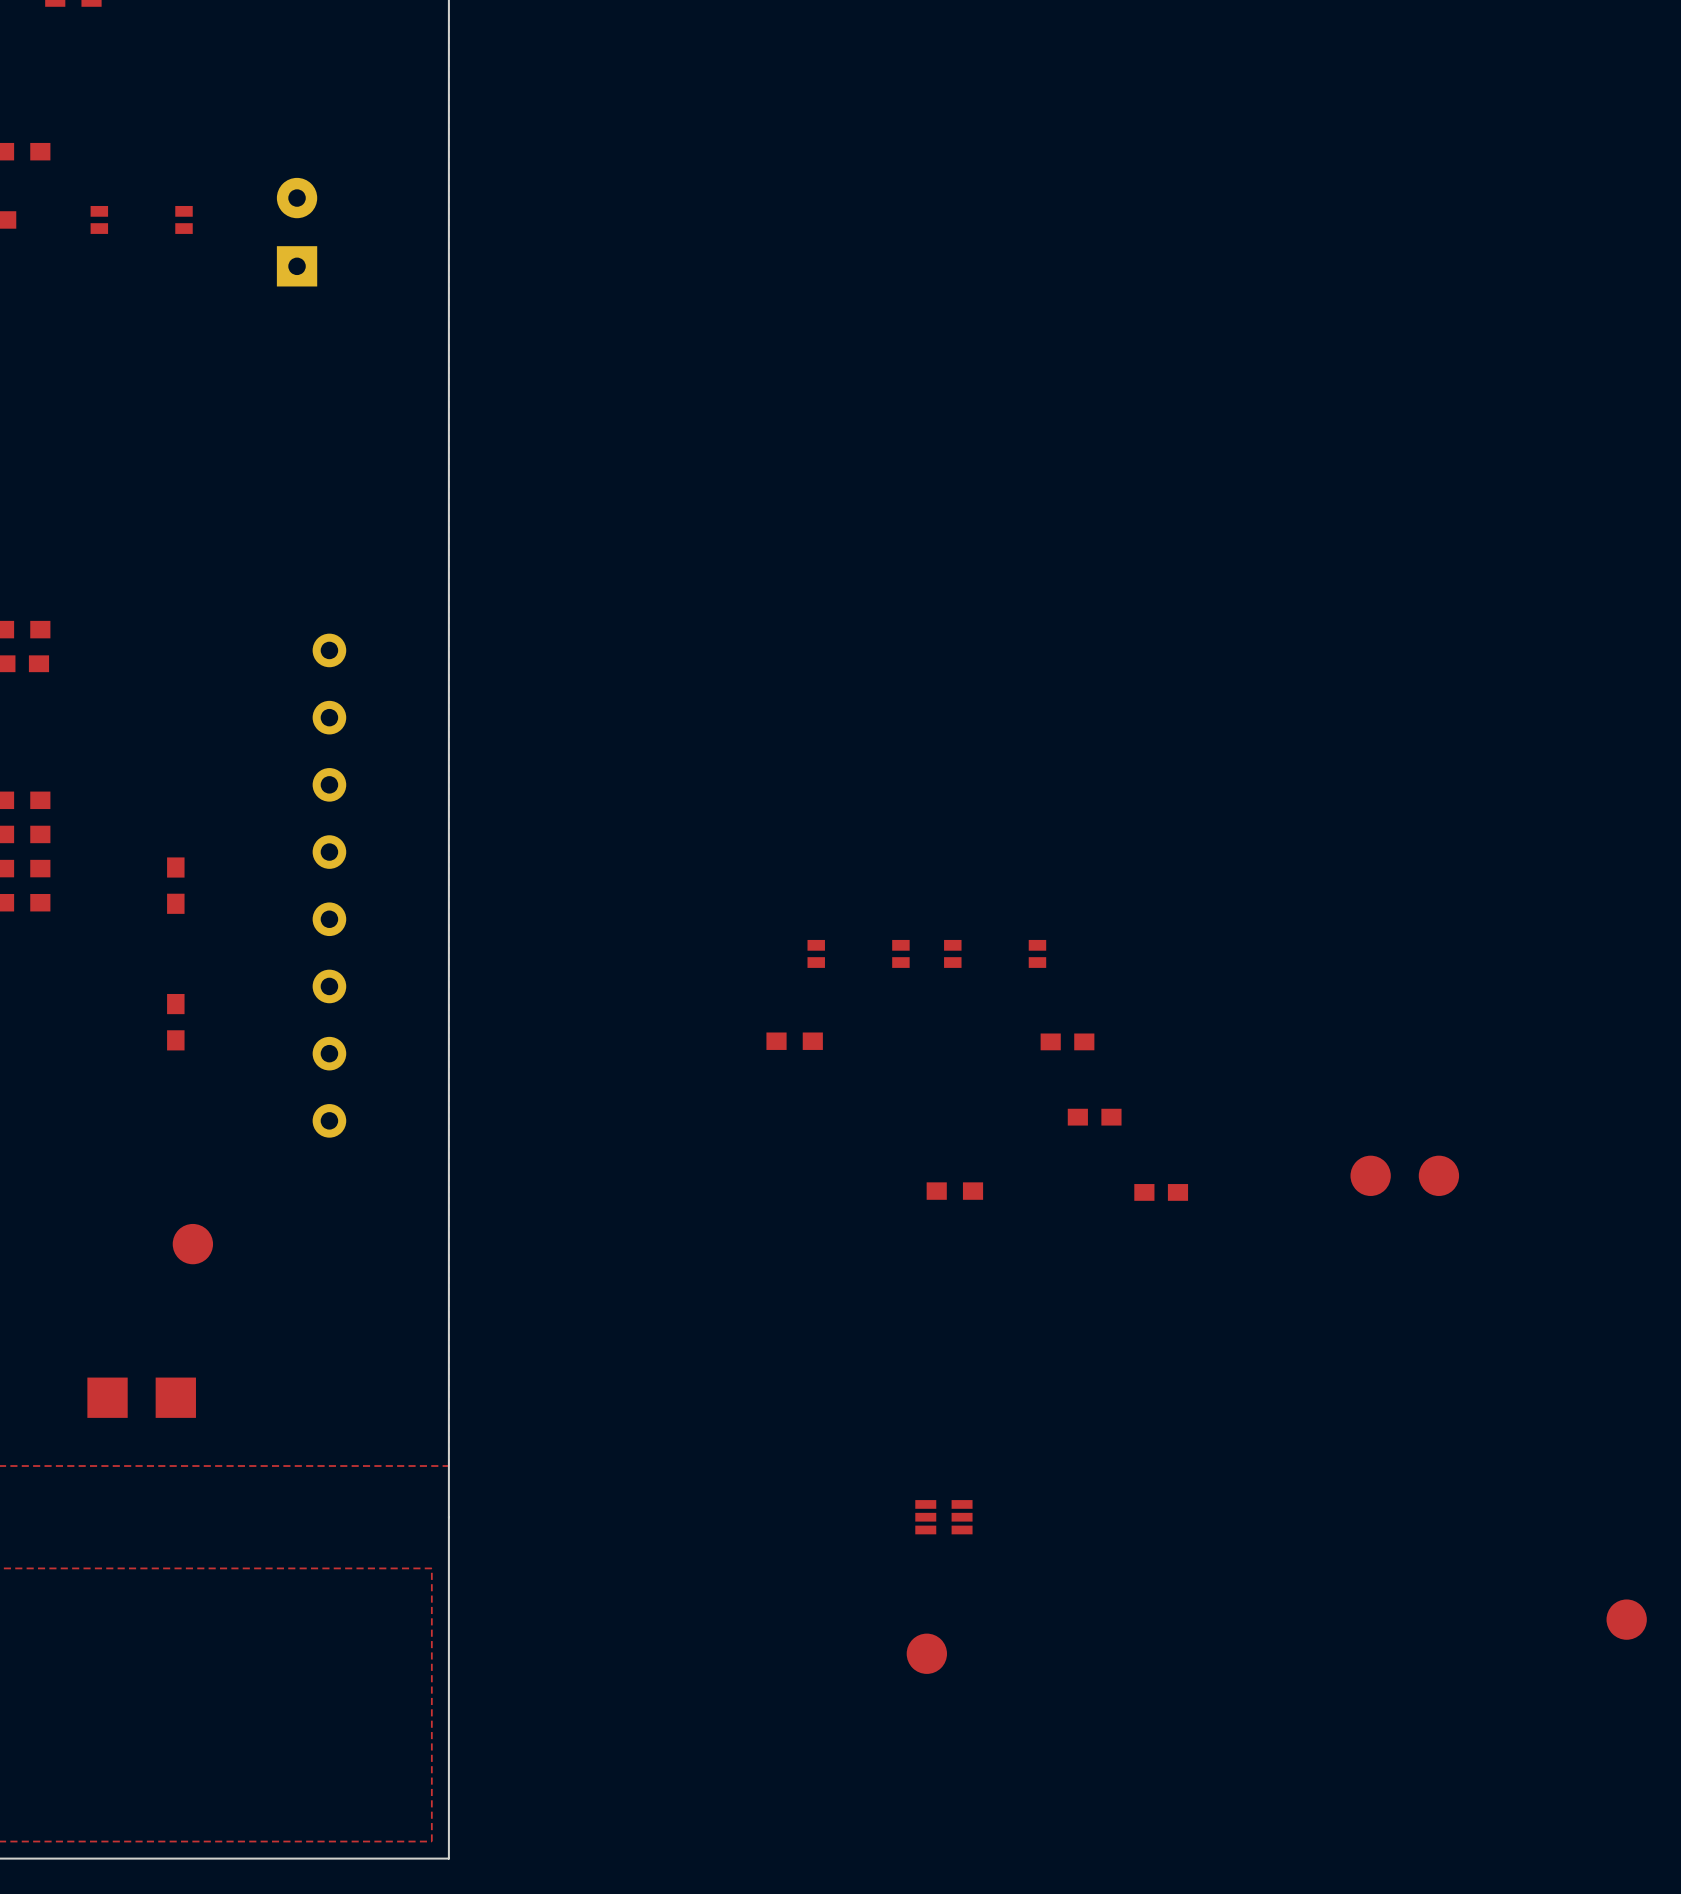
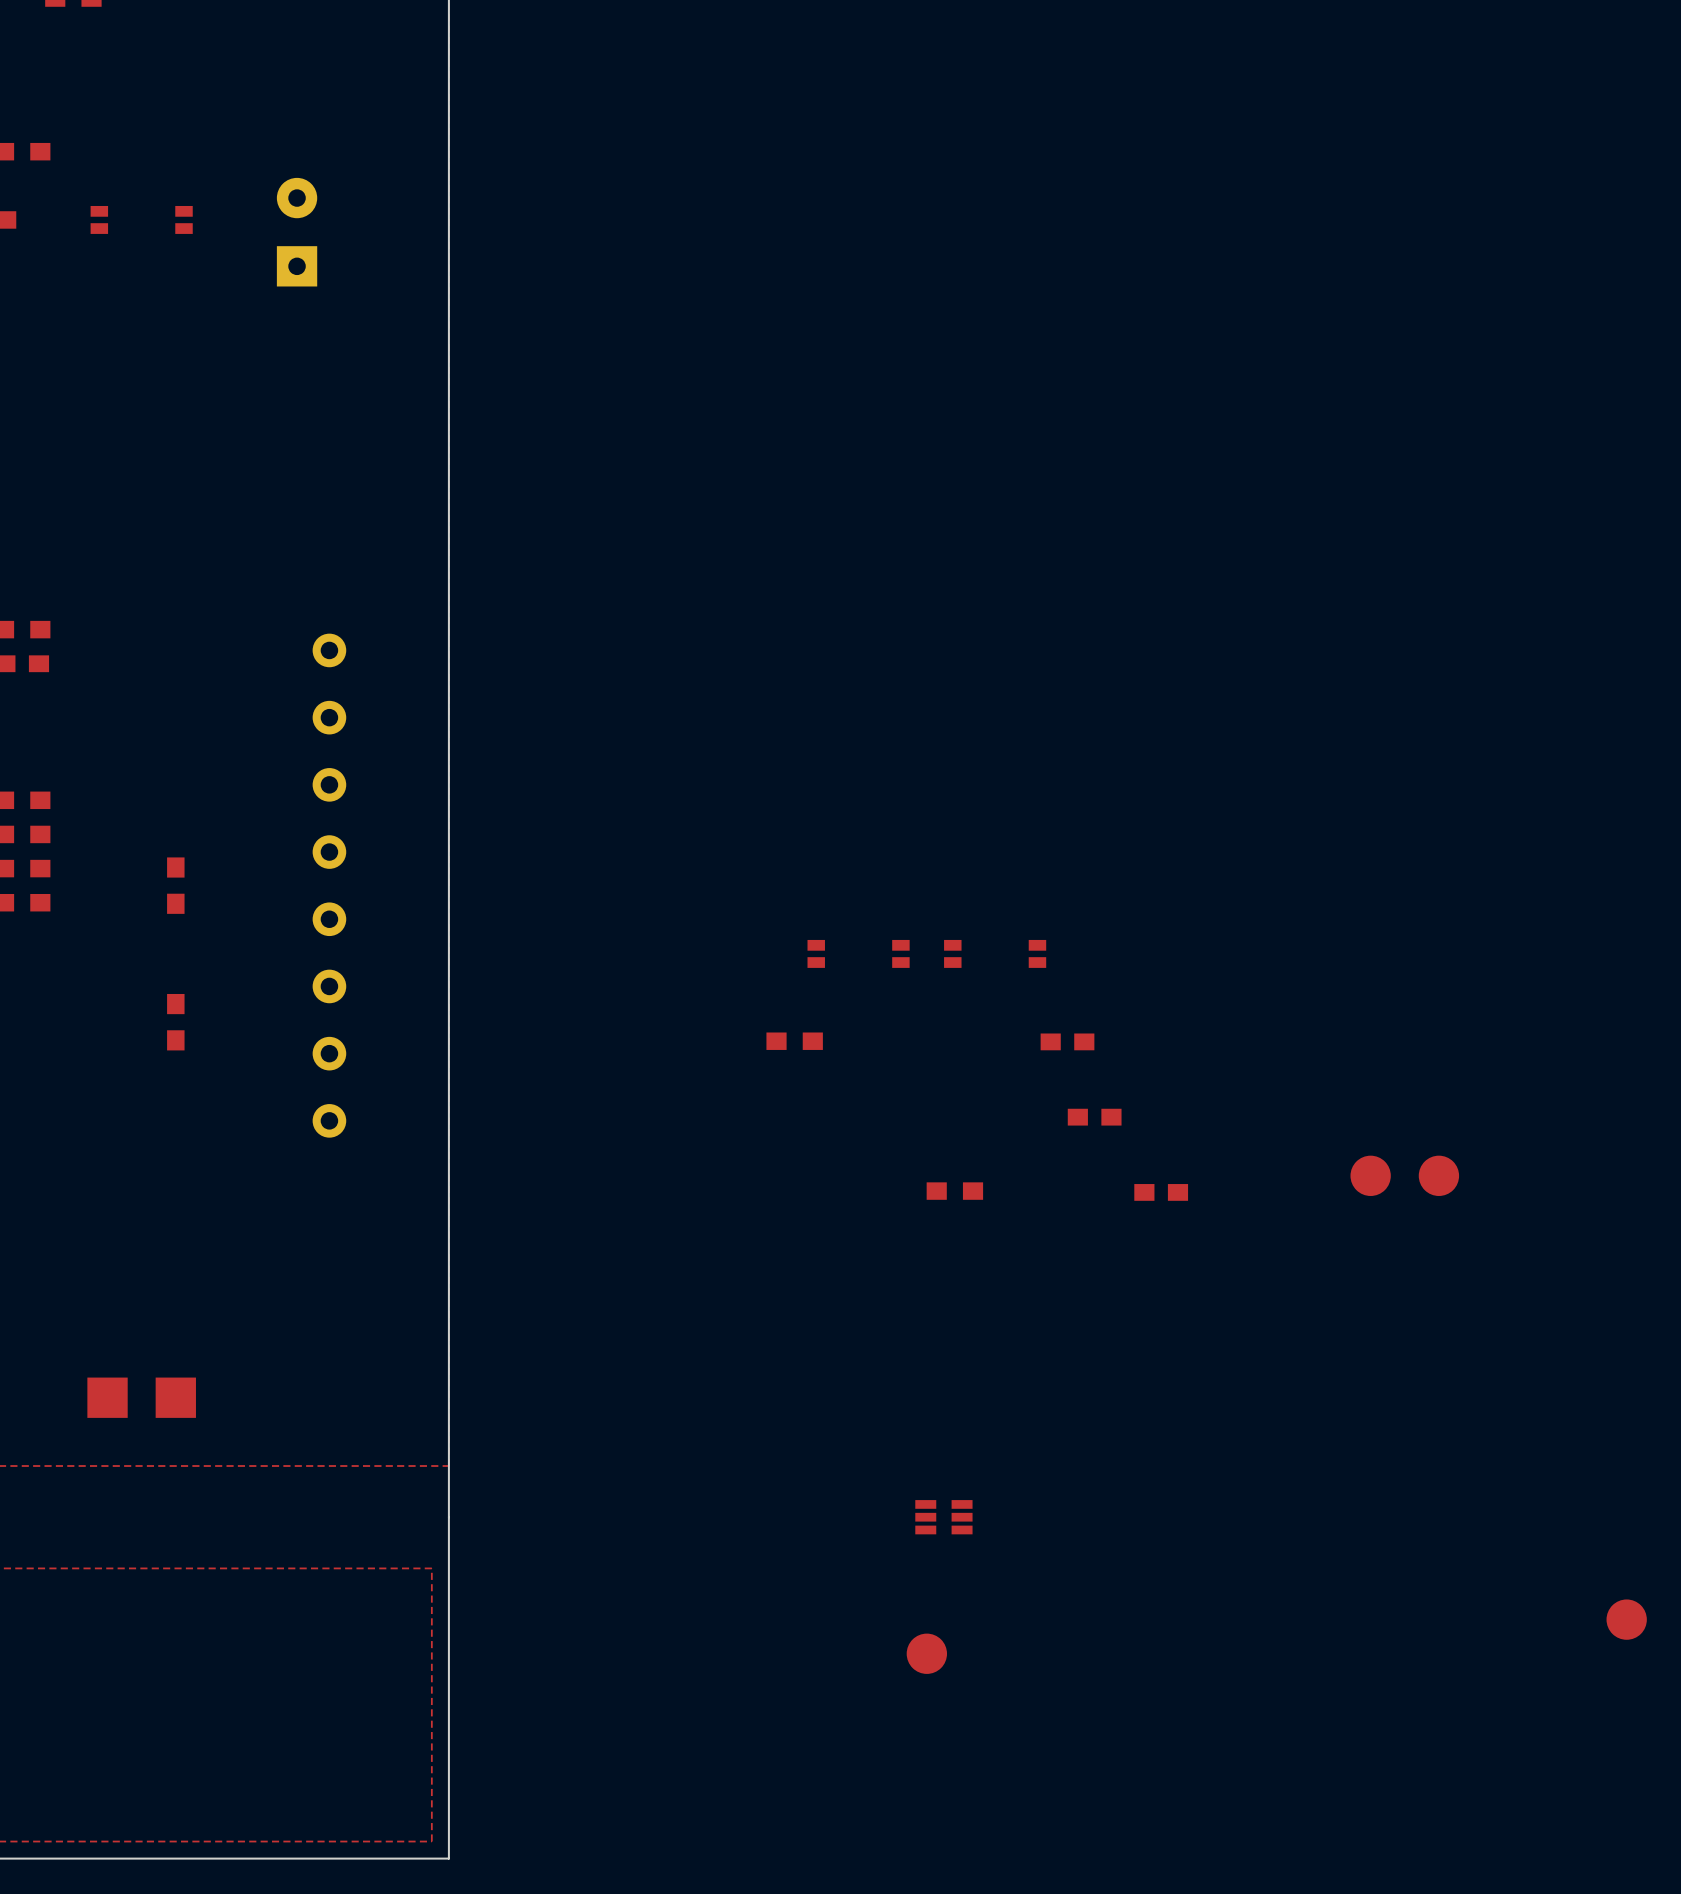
part: (192, 1244) -> none

